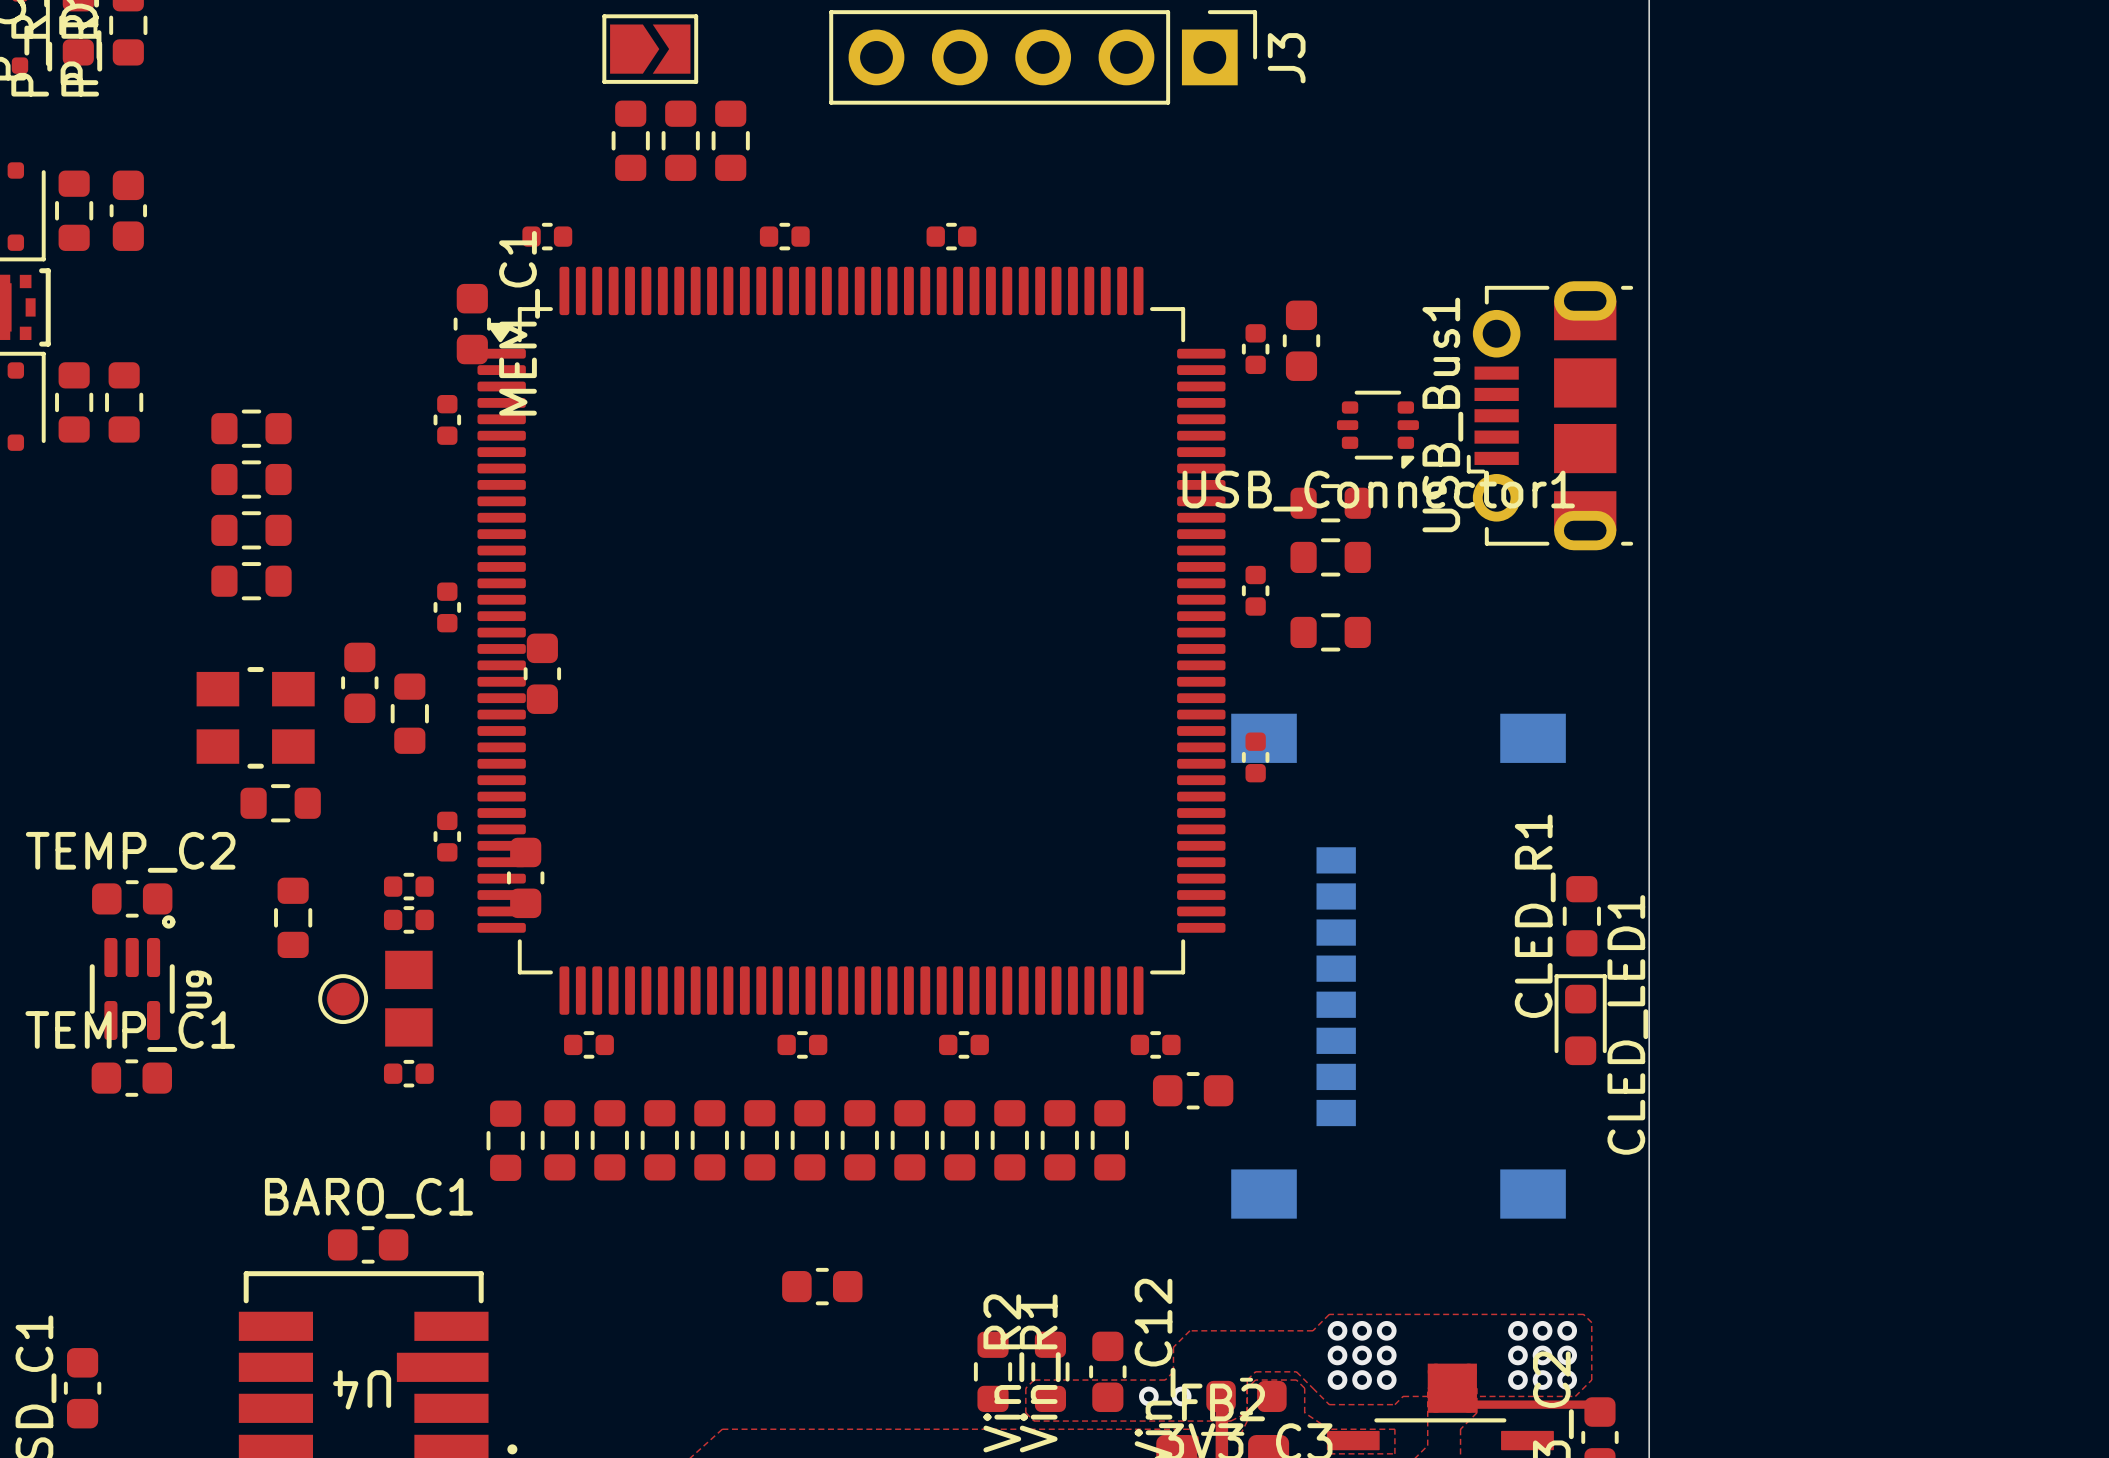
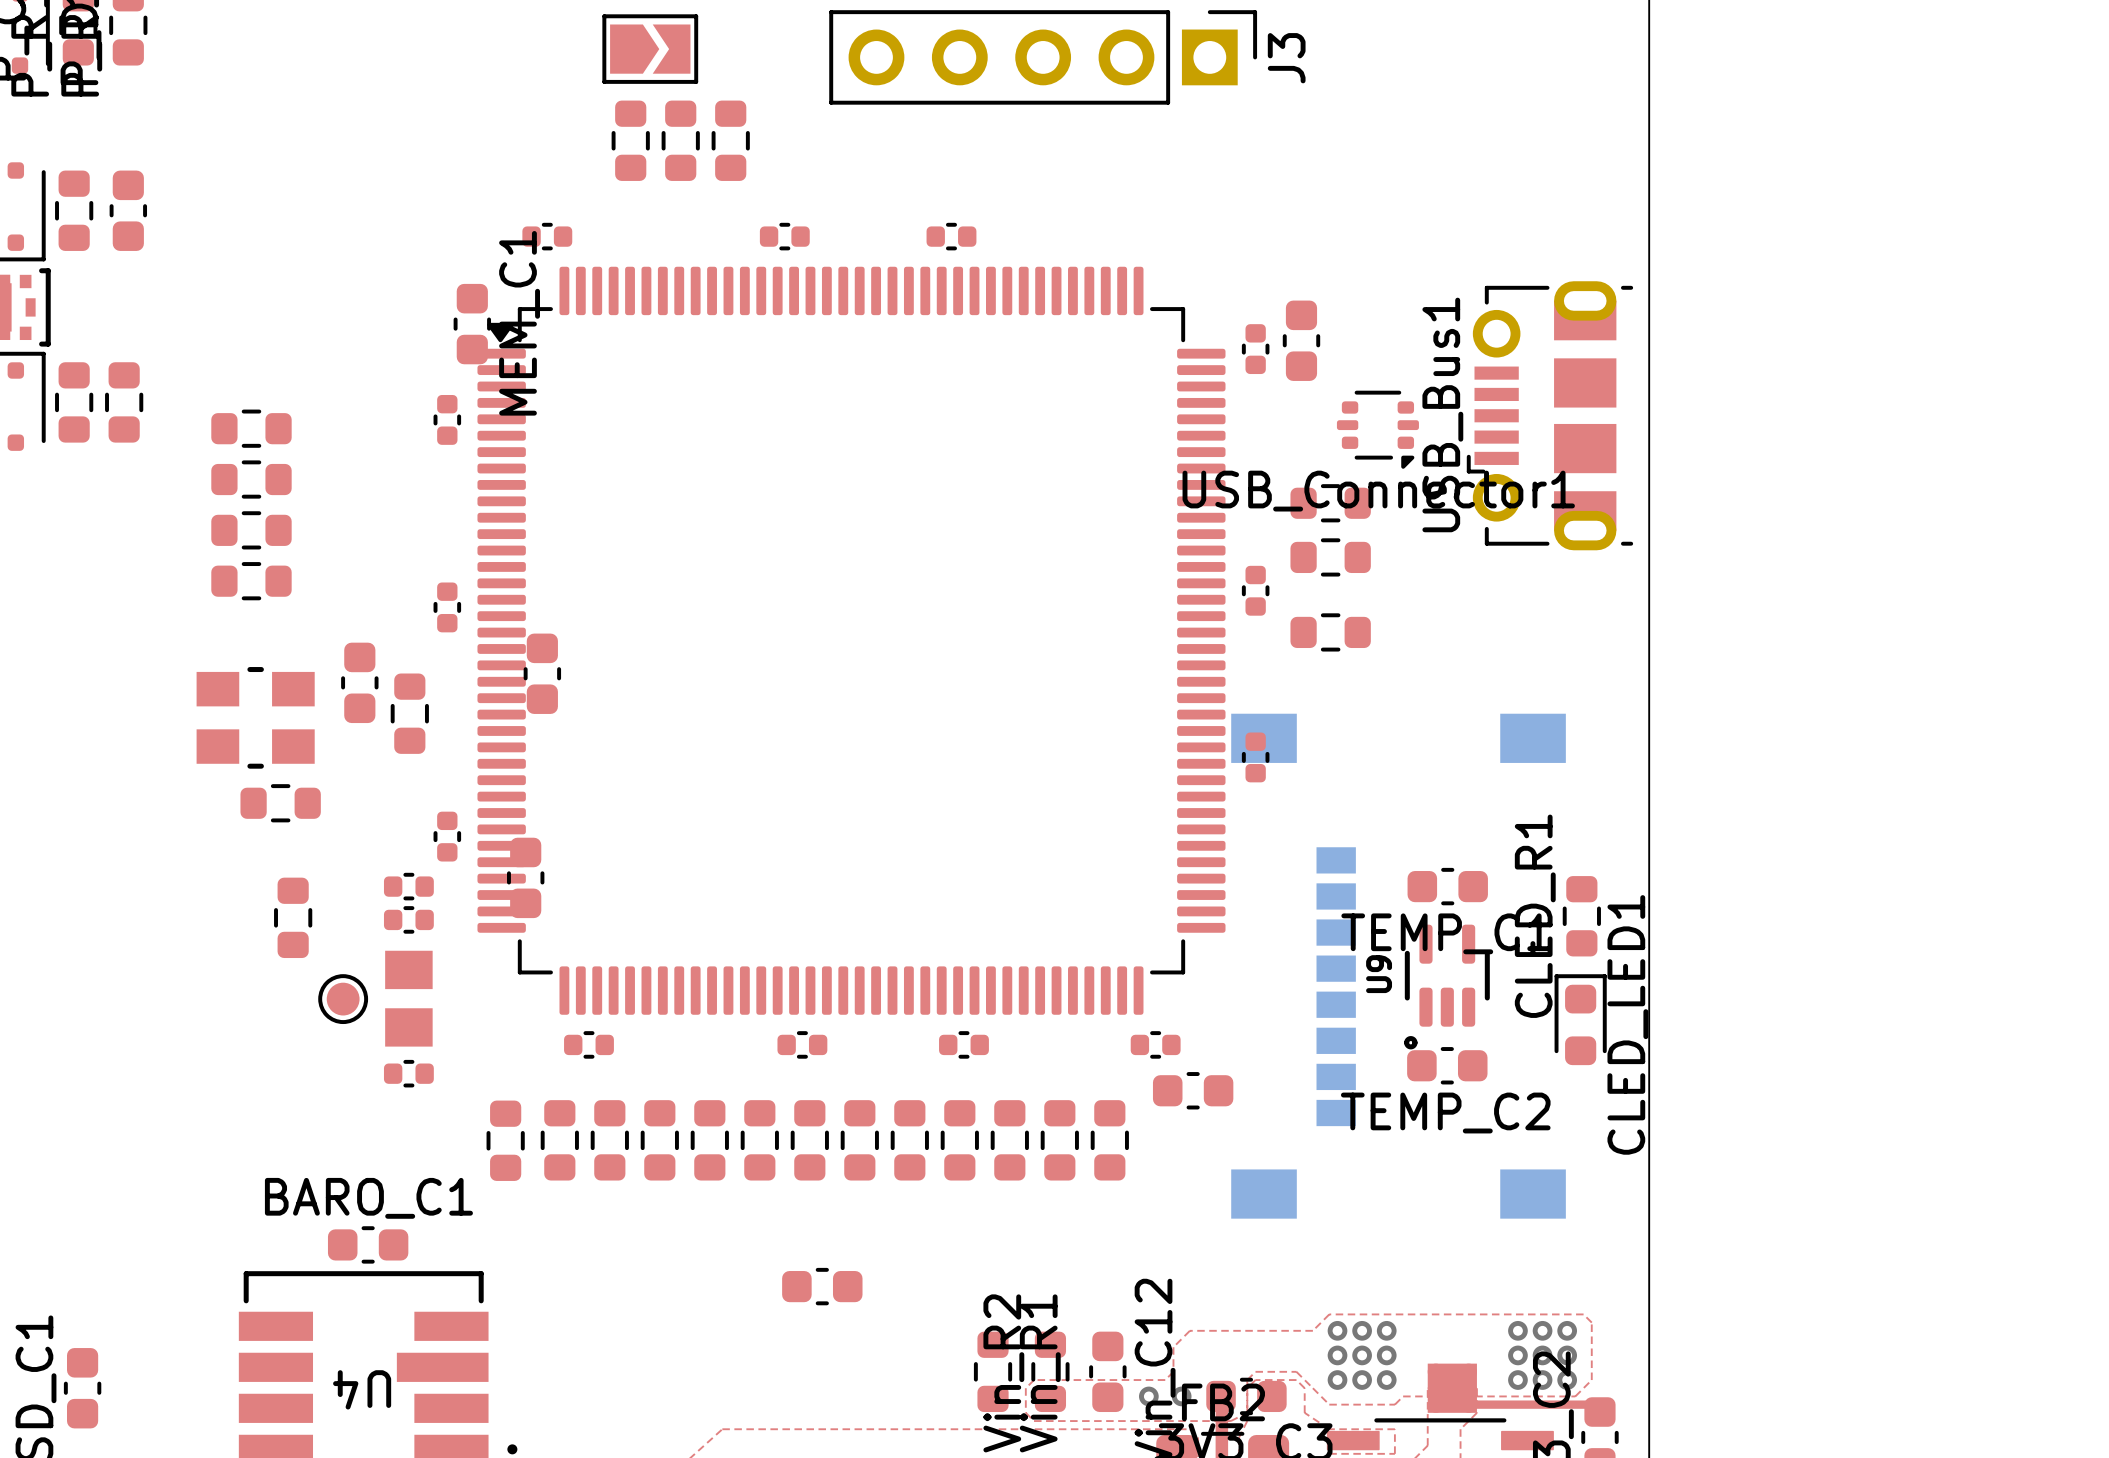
TEMP_C2 name position: TEMP_C2 (130, 852) -> TEMP_C2 (1445, 1113)
TEMP_C2 position: (132, 898) -> (1447, 1065)
U9 rotation: 0° (132, 977) -> 180° (1446, 987)
U9 position: (132, 977) -> (1446, 987)
TEMP_C1 name position: TEMP_C1 (130, 1031) -> TEMP_C1 (1446, 933)
TEMP_C1 position: (131, 1078) -> (1447, 886)

